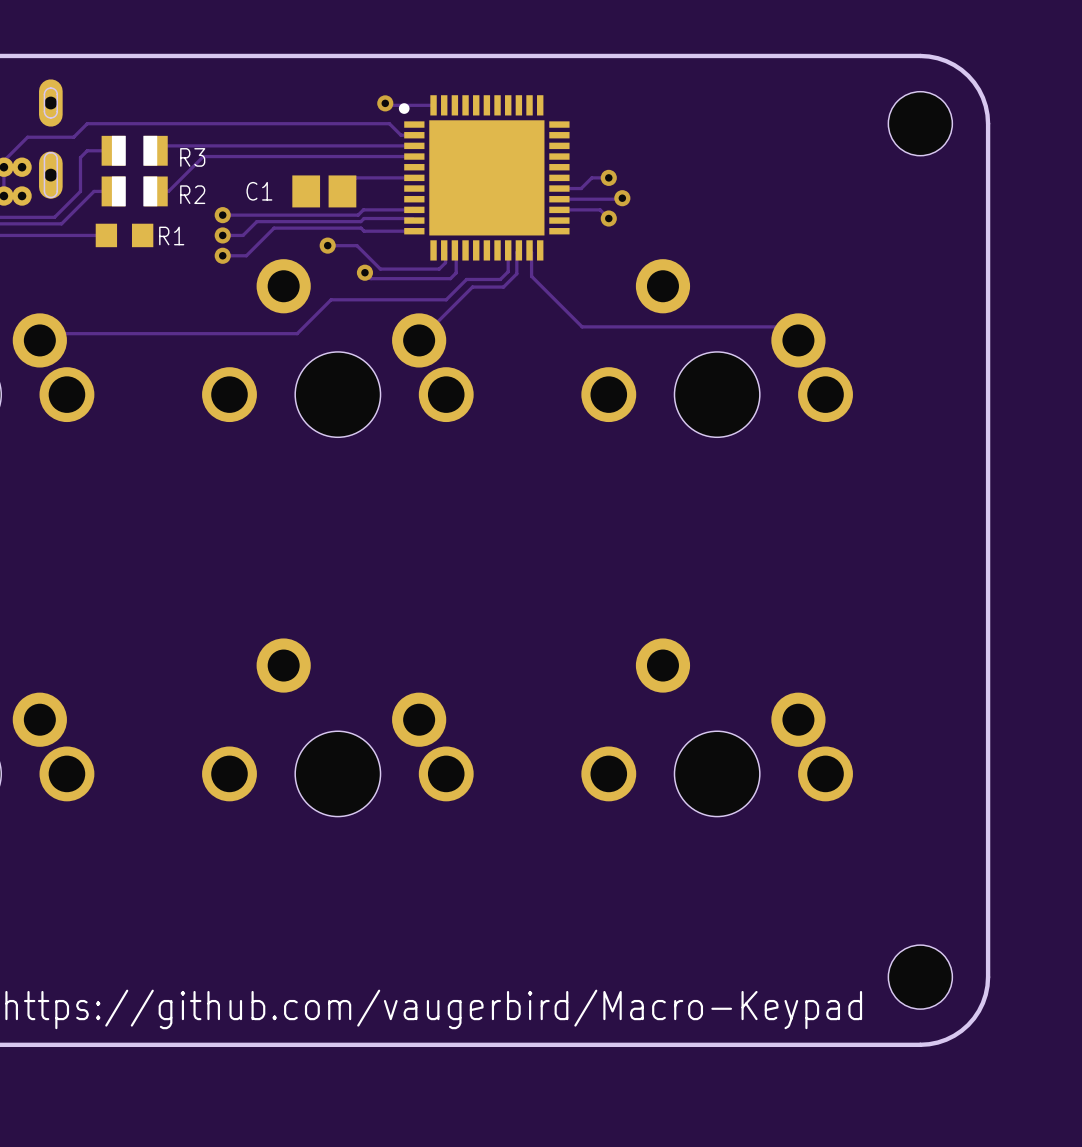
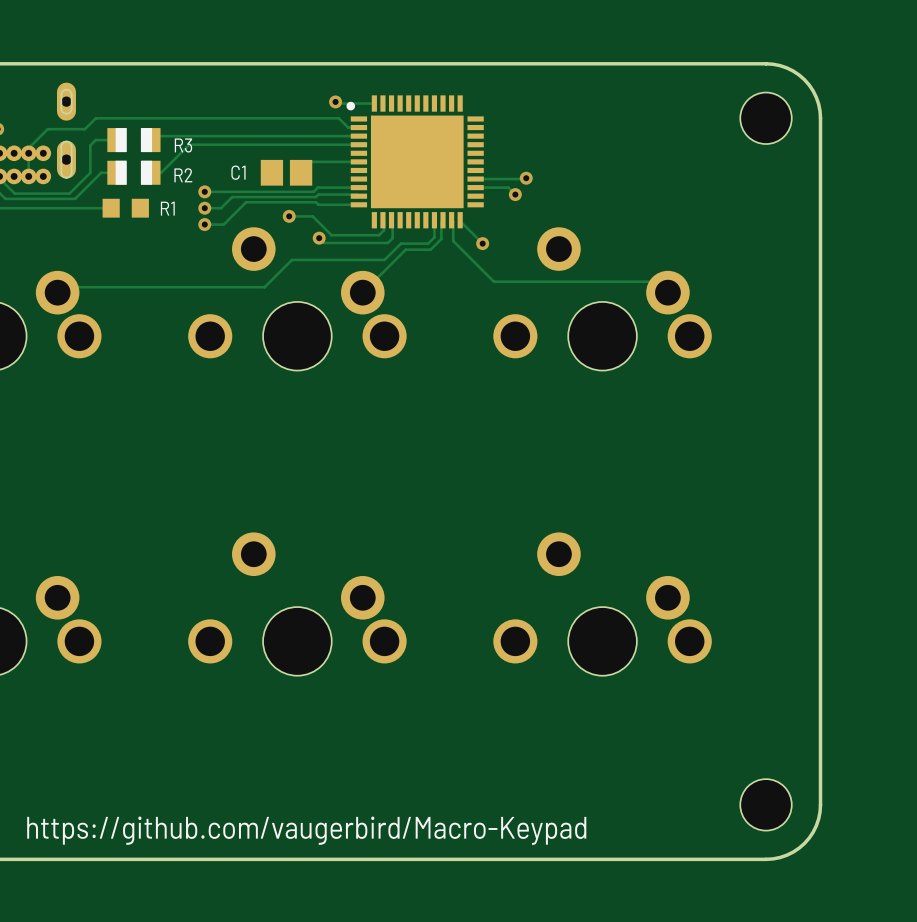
track: (608, 177) (591, 177) (581, 188) (559, 188) -> none
via position: (608, 177) -> (482, 243)
track: none -> (460, 220) (482, 243)

